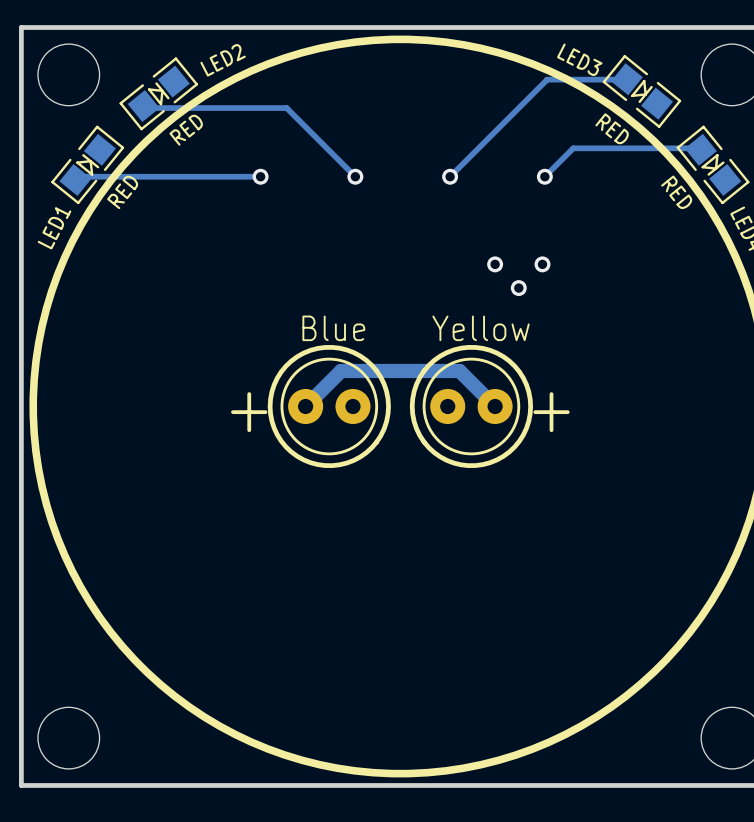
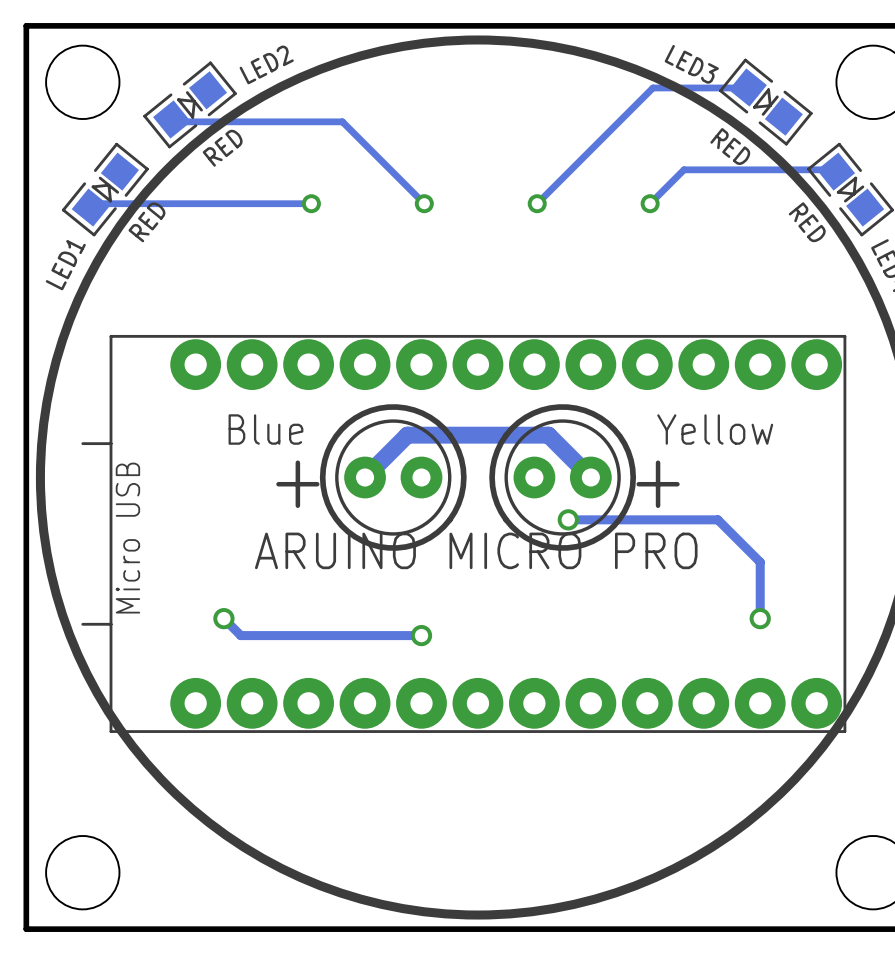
via: (495, 264) -> none
via: (542, 264) -> none
via: (518, 288) -> none
text position: Blue (333, 328) -> Blue (265, 429)
text position: Yellow (481, 328) -> Yellow (715, 429)
track: none -> (568, 519) (717, 519) (760, 562) (760, 618)
via: none -> (568, 519)
part: none -> (463, 533)
track: none -> (223, 618) (240, 635) (421, 635)
via: none -> (223, 618)
via: none -> (760, 618)
via: none -> (421, 635)

